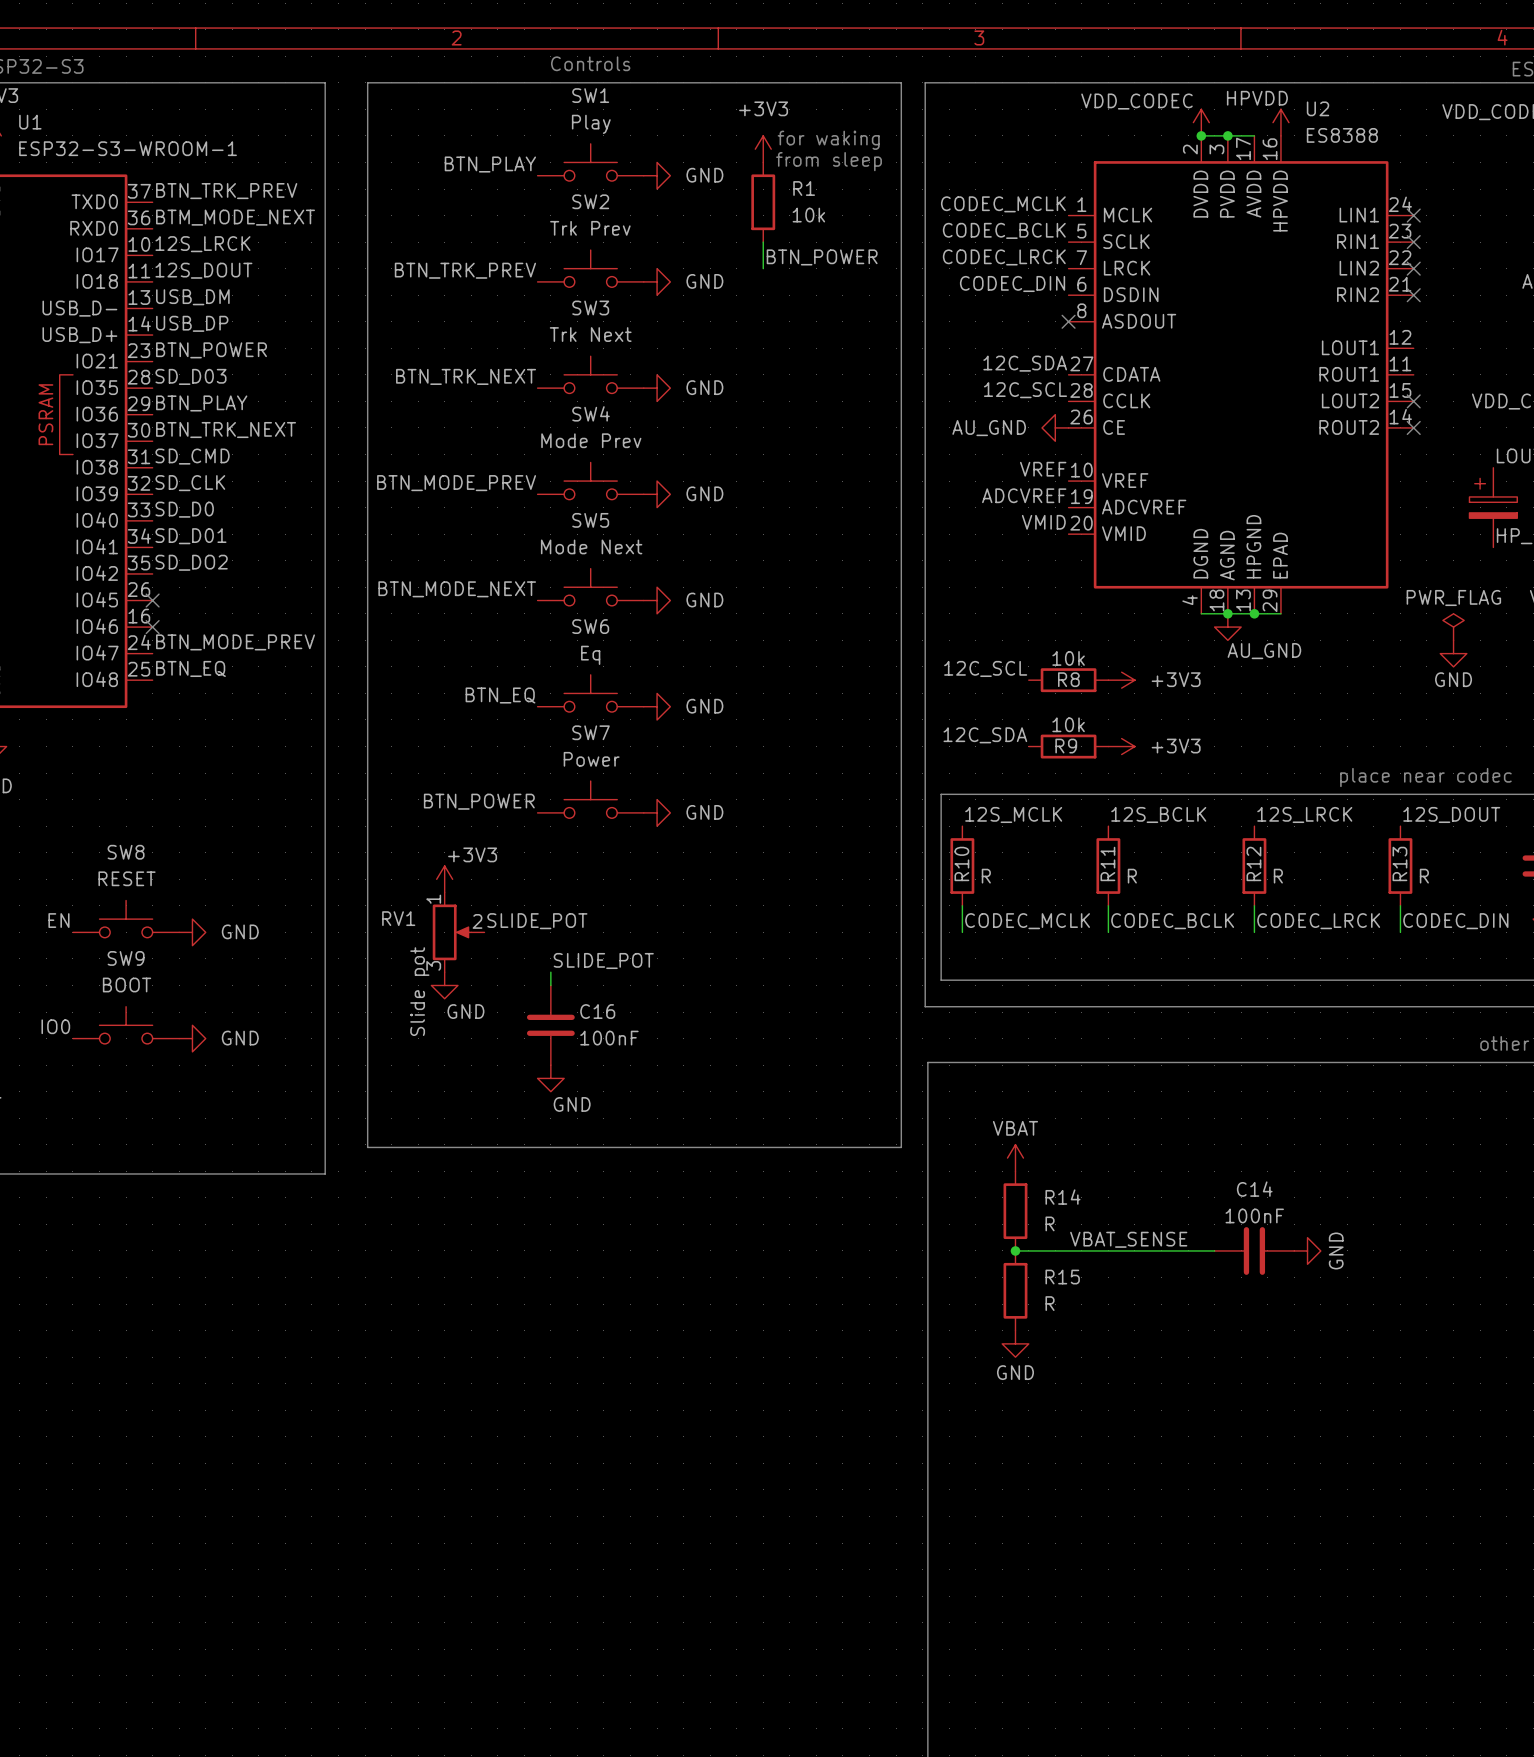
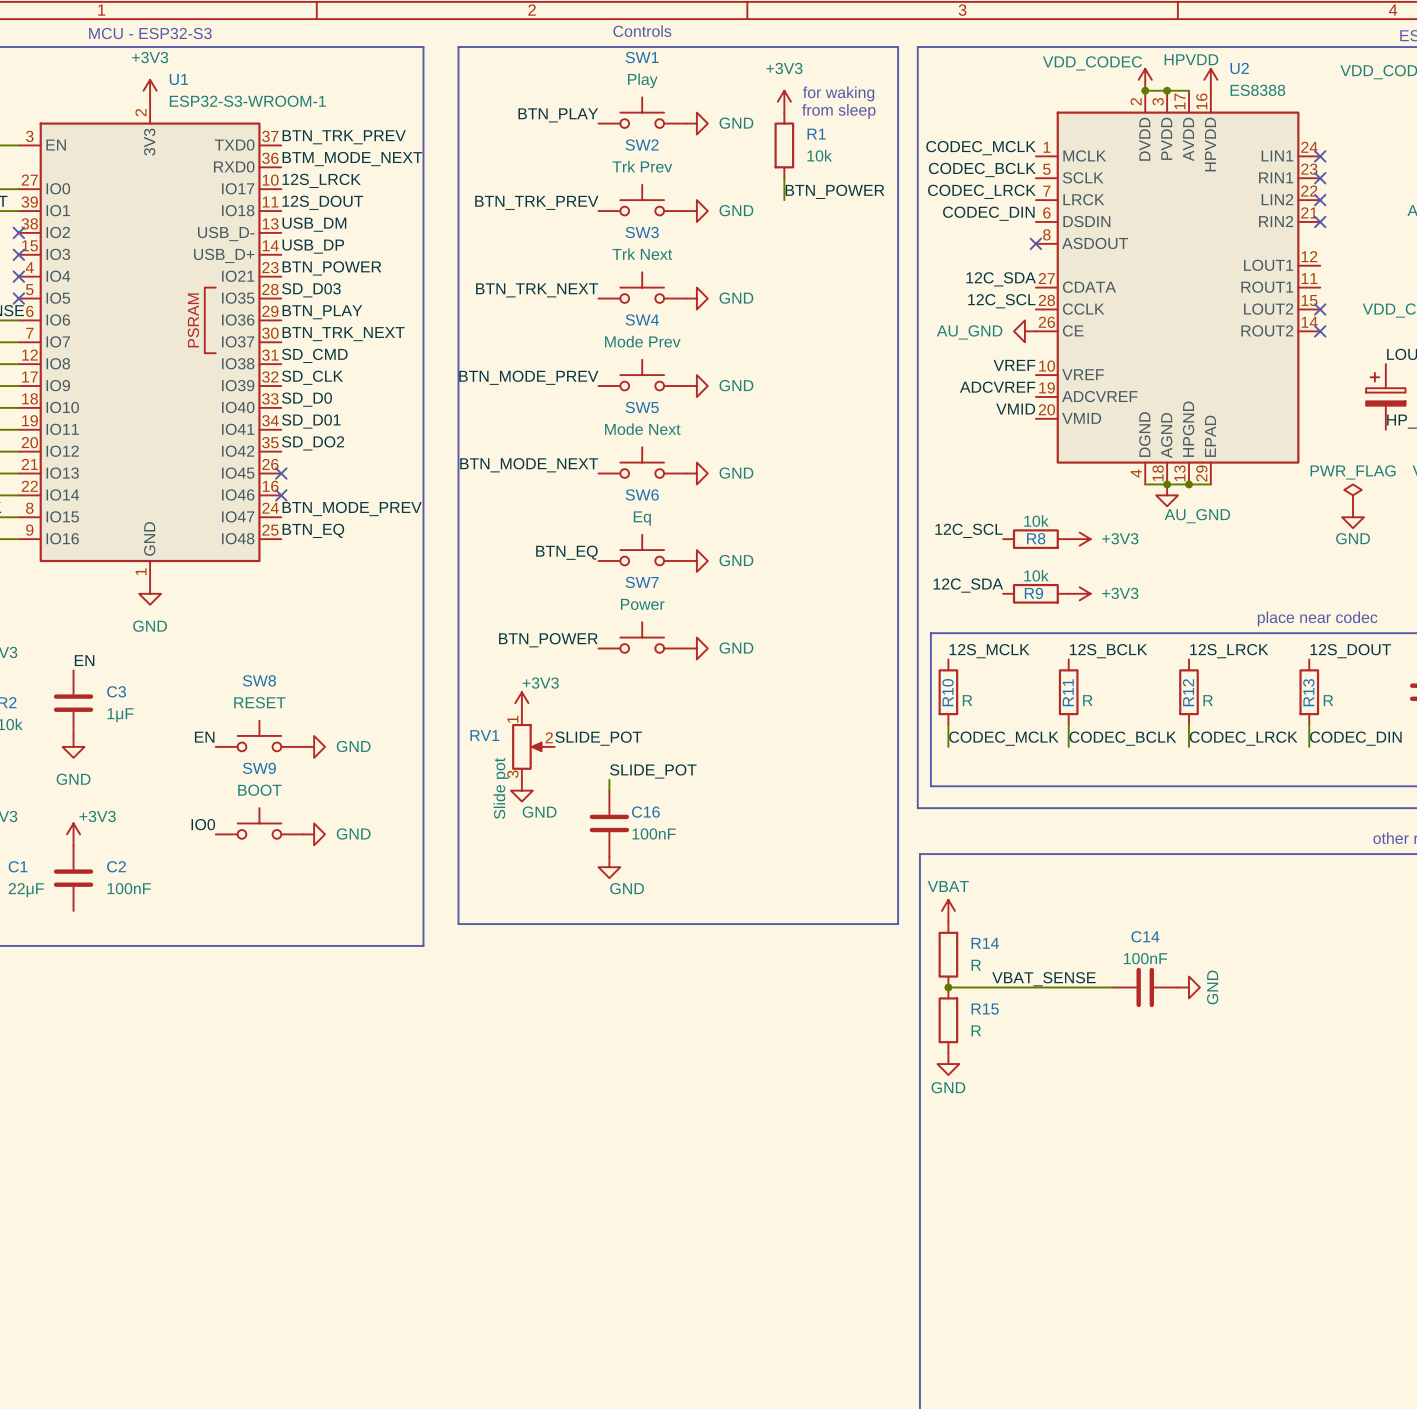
power symbol position: VBAT (1015, 1158) -> VBAT (948, 910)
R14 position: (1015, 1211) -> (948, 954)
label position: VBAT_SENSE (1128, 1239) -> VBAT_SENSE (1043, 979)
wire: (1015, 1250) (1214, 1250) -> (948, 987) (1112, 987)
junction position: (1015, 1250) -> (948, 987)
C14 position: (1254, 1250) -> (1145, 987)
power symbol position: GND (1307, 1250) -> GND (1188, 987)
R15 position: (1015, 1290) -> (948, 1020)
power symbol position: GND (1015, 1343) -> GND (948, 1064)

